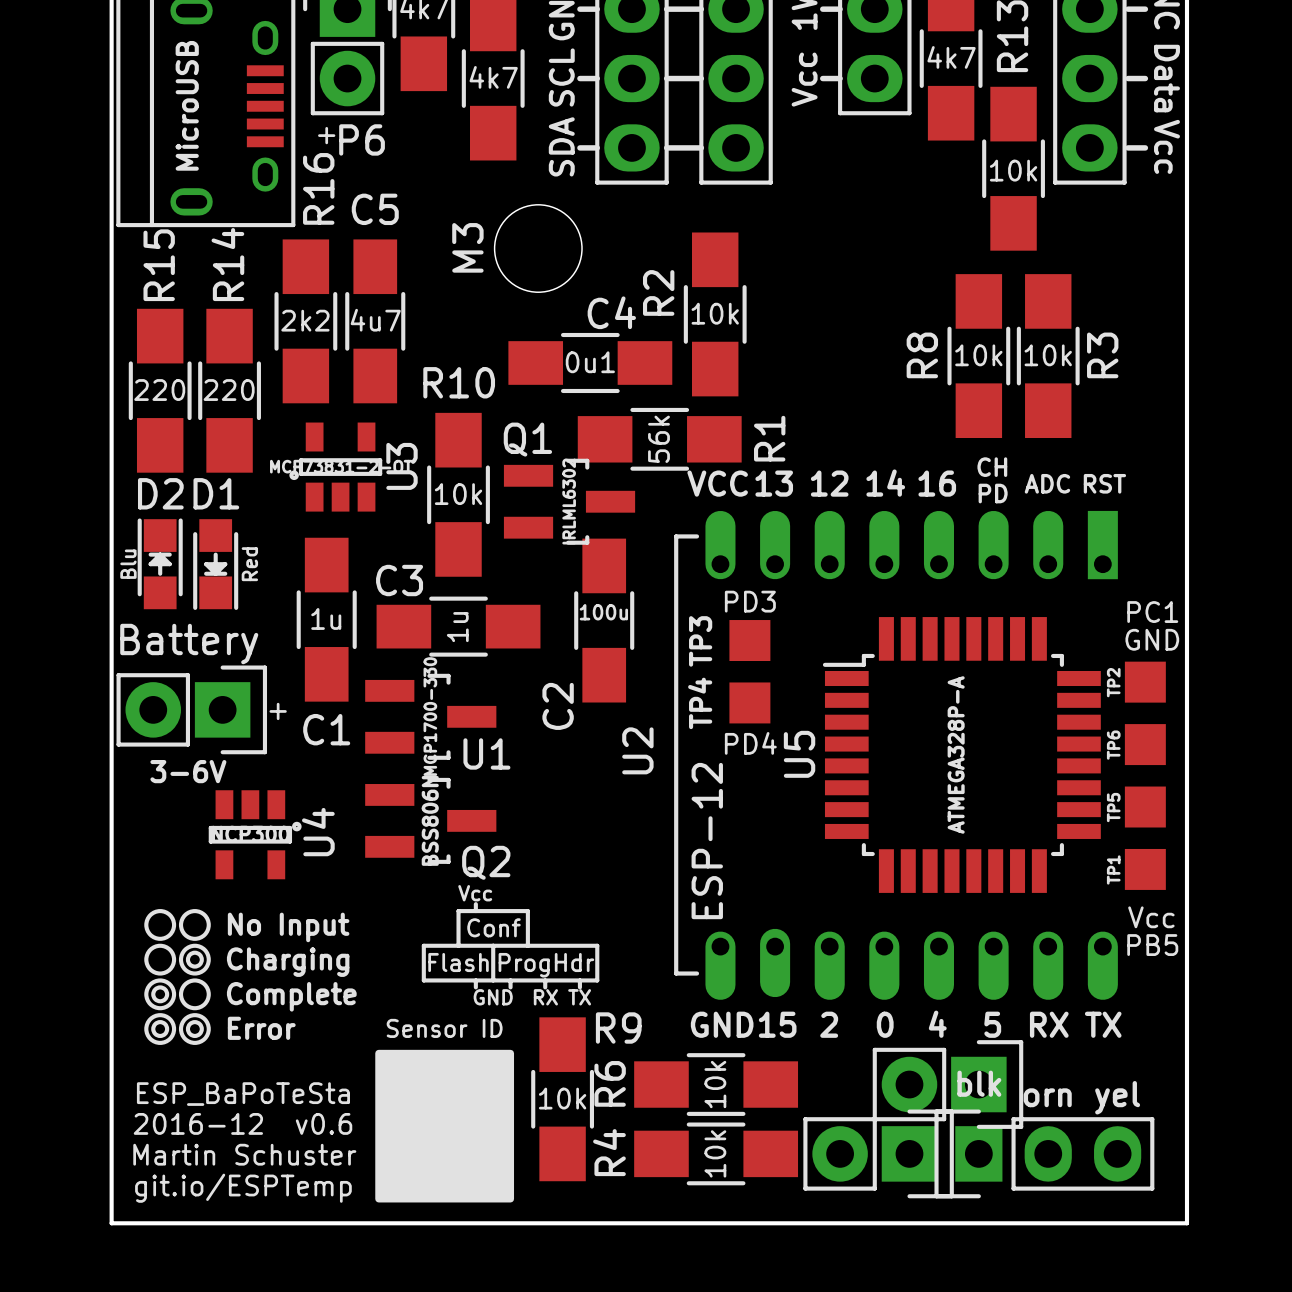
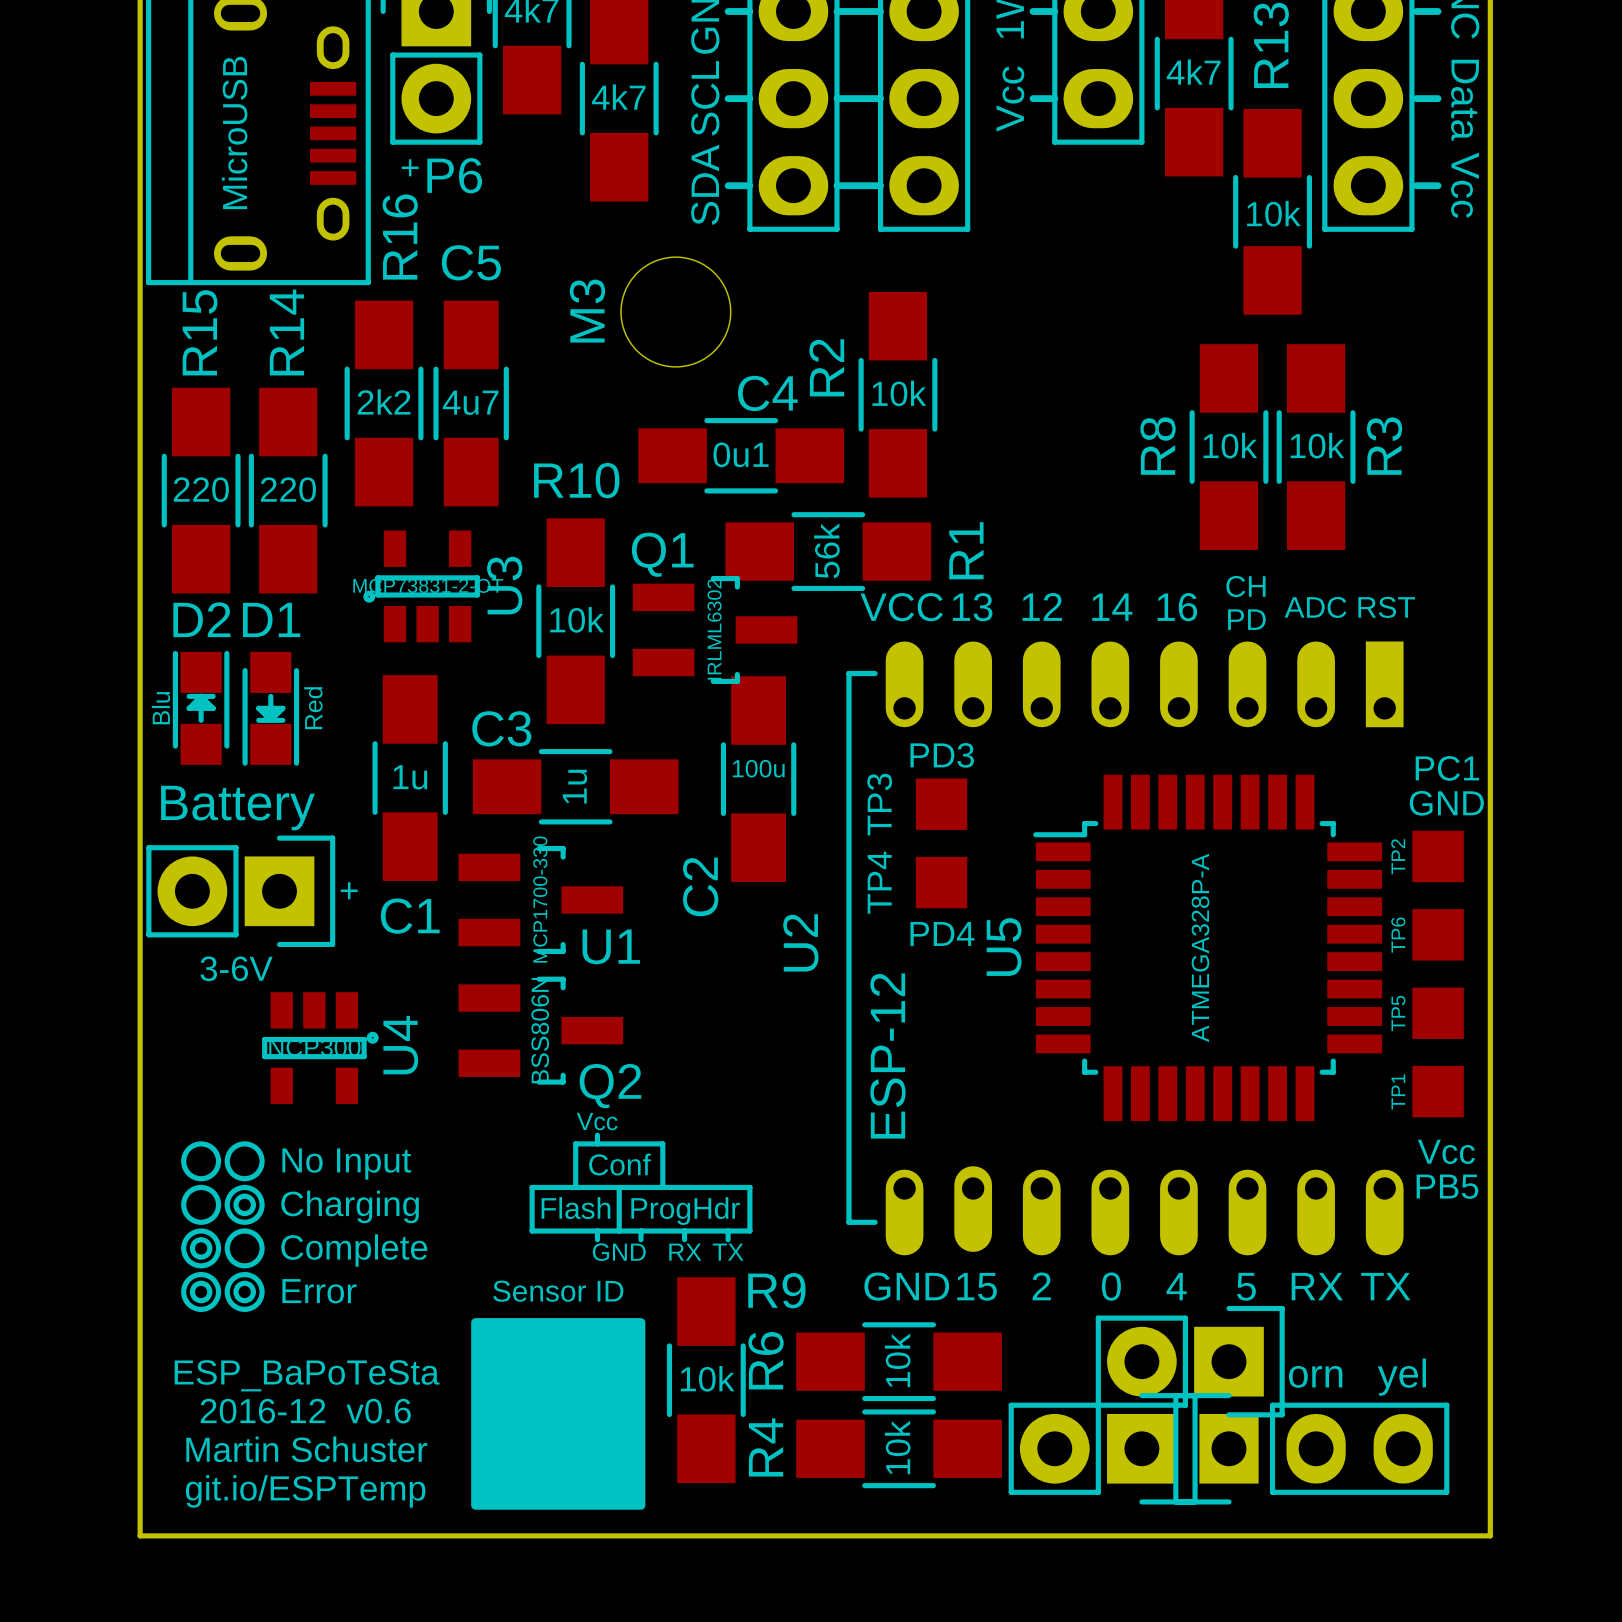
text: blk (979, 1083) -> none

